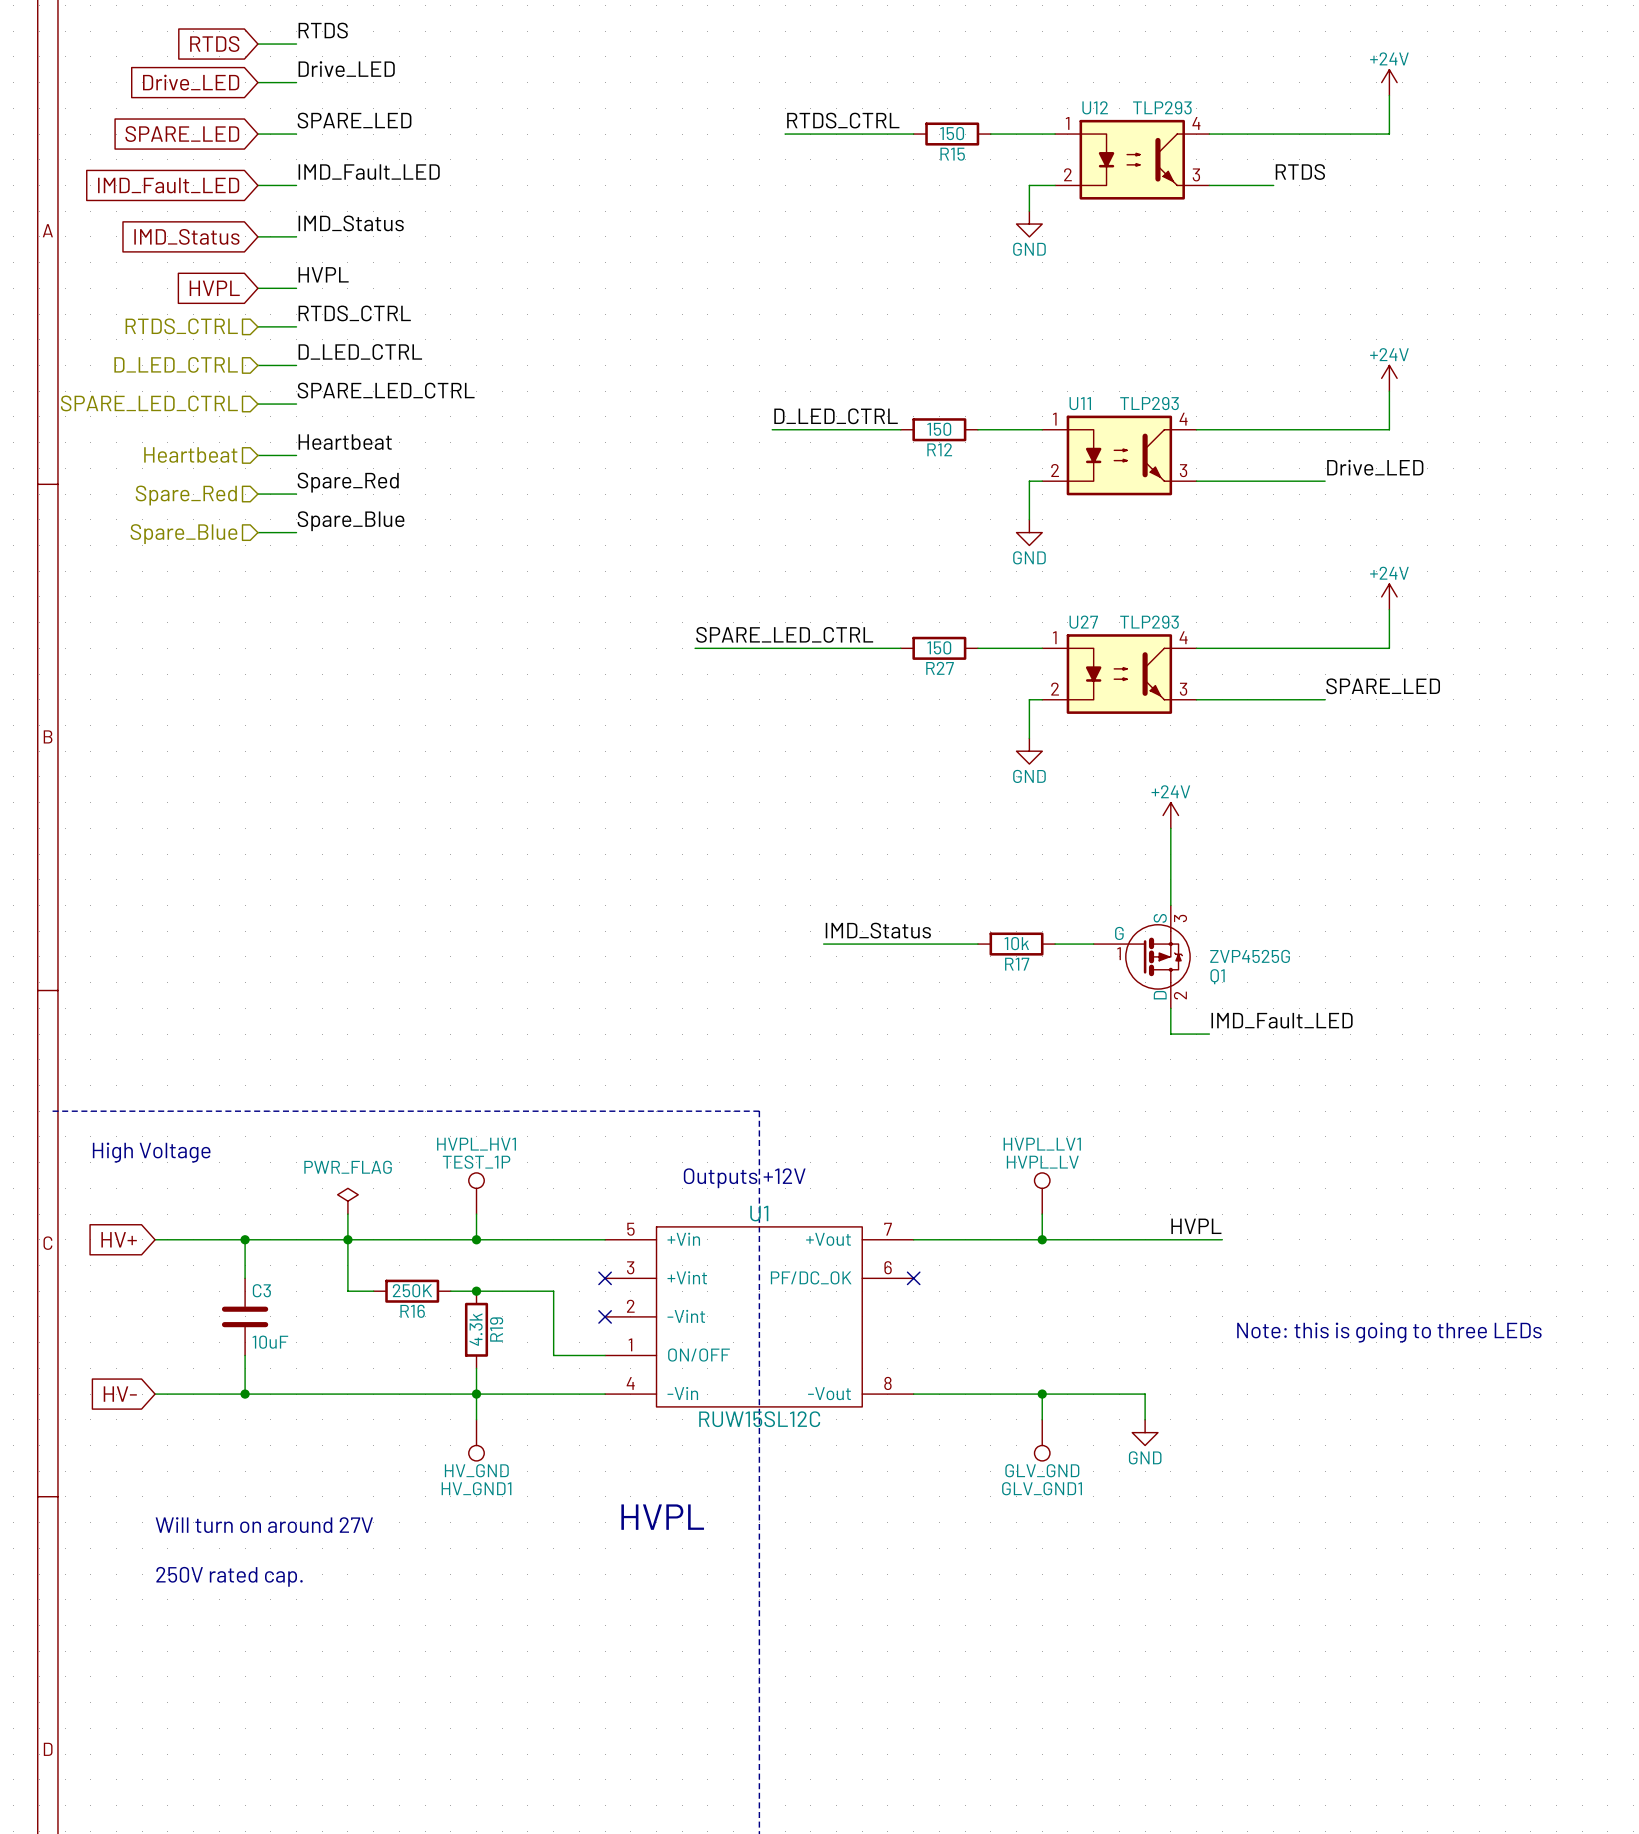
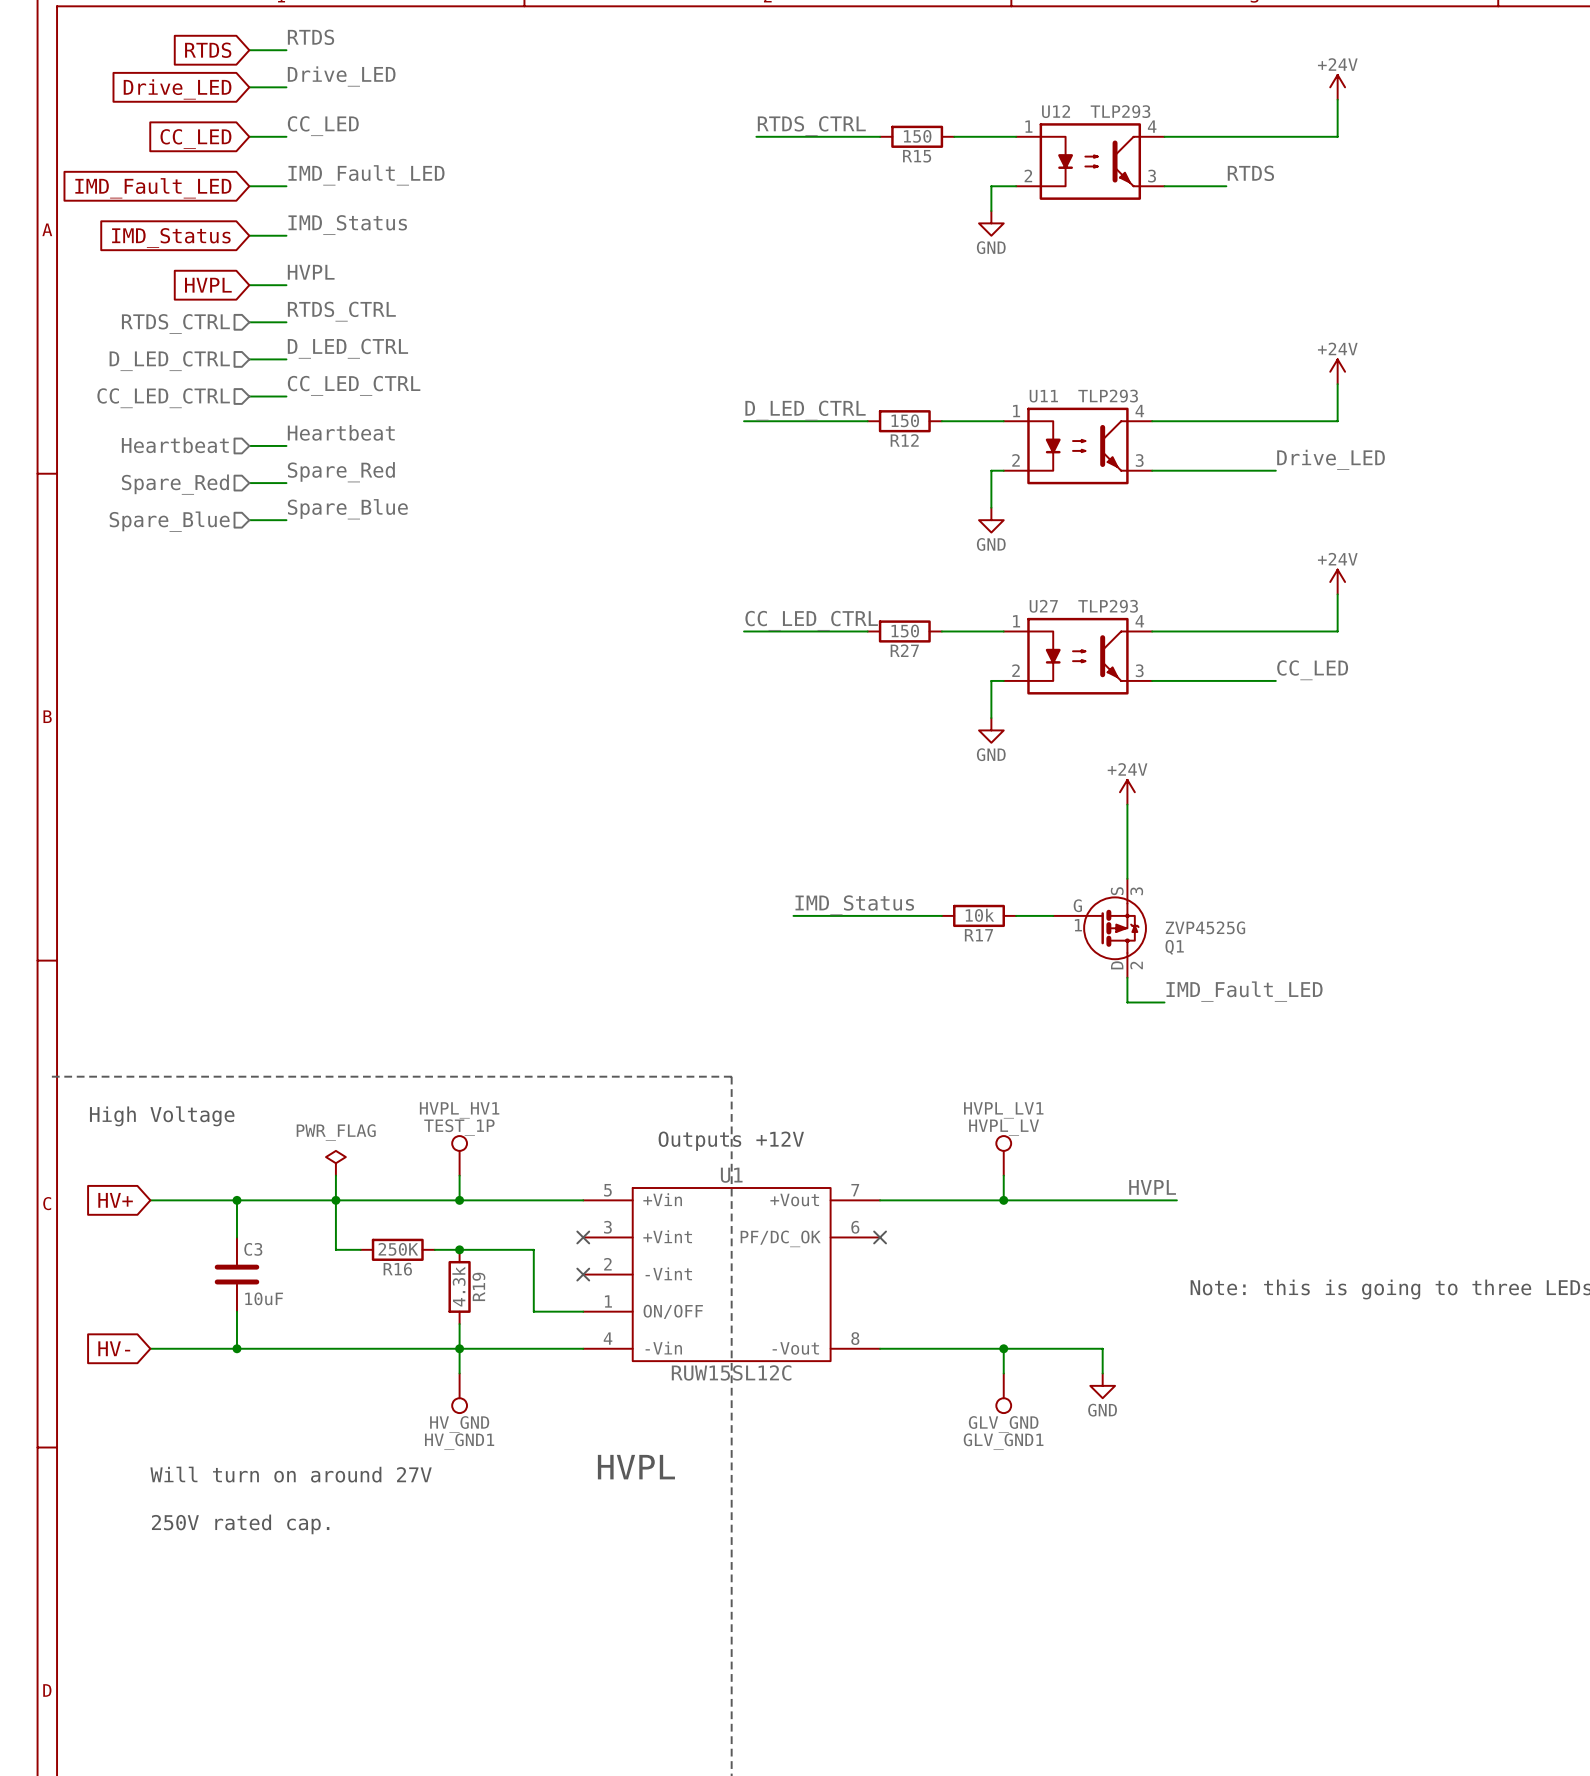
label: SPARE_LED (354, 120) -> CC_LED (323, 126)
global label: SPARE_LED (182, 134) -> CC_LED (195, 139)
label: SPARE_LED_CTRL (386, 390) -> CC_LED_CTRL (354, 385)
hierarchical label: SPARE_LED_CTRL (149, 403) -> CC_LED_CTRL (163, 398)
label: SPARE_LED_CTRL (784, 634) -> CC_LED_CTRL (811, 620)
wire: (695, 648) (772, 648) -> none
label: SPARE_LED (1383, 686) -> CC_LED (1312, 670)

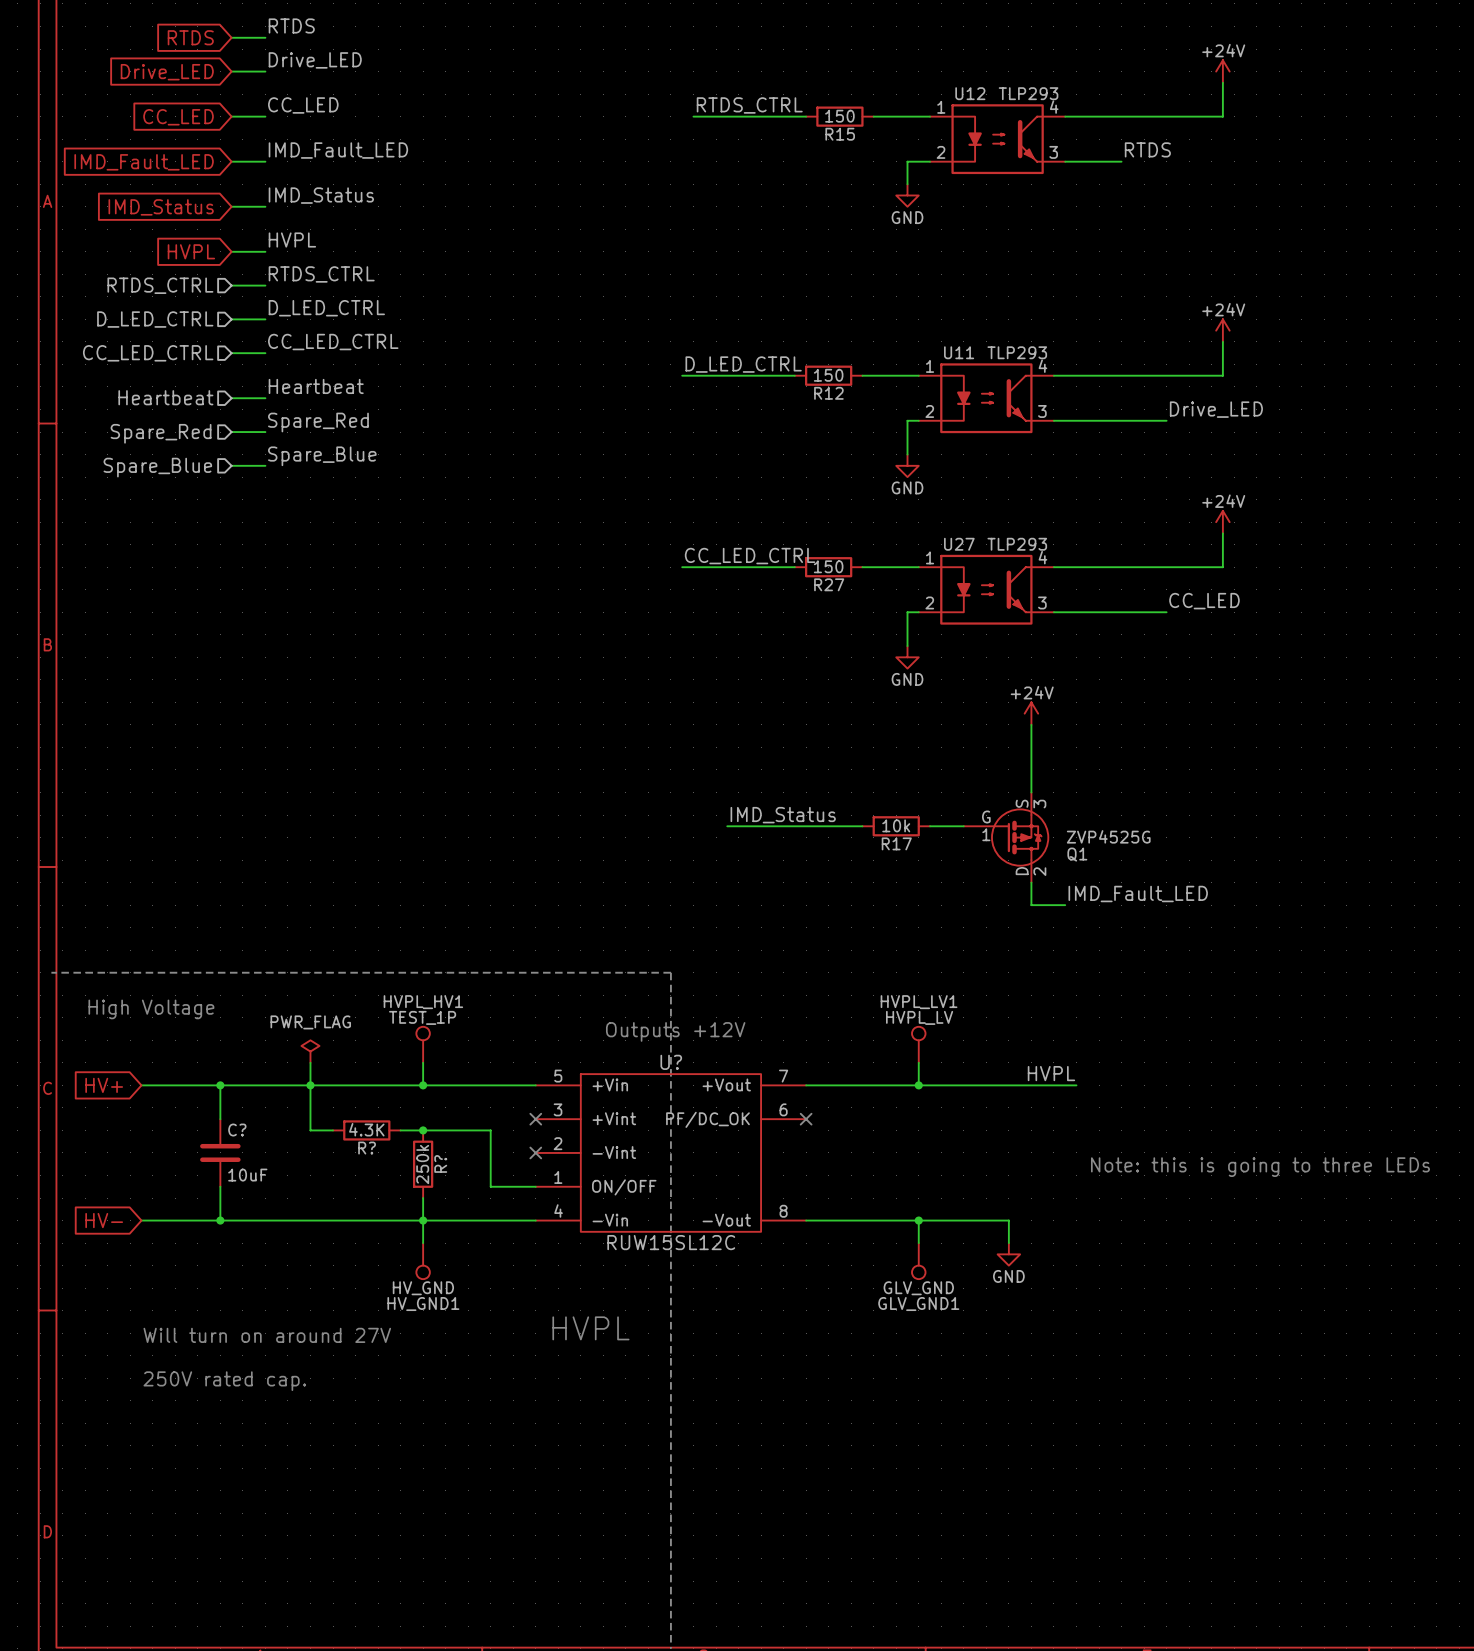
U1 name: U1 (731, 1175) -> U? (671, 1062)
C3 name: C3 (253, 1249) -> C? (237, 1130)
R16 value: 250K (398, 1249) -> 4.3K (366, 1129)
R16 name: R16 (397, 1269) -> R? (367, 1148)
R19 value: 4.3k (458, 1286) -> 250k (422, 1164)
R19 name: R19 (478, 1286) -> R? (440, 1163)

